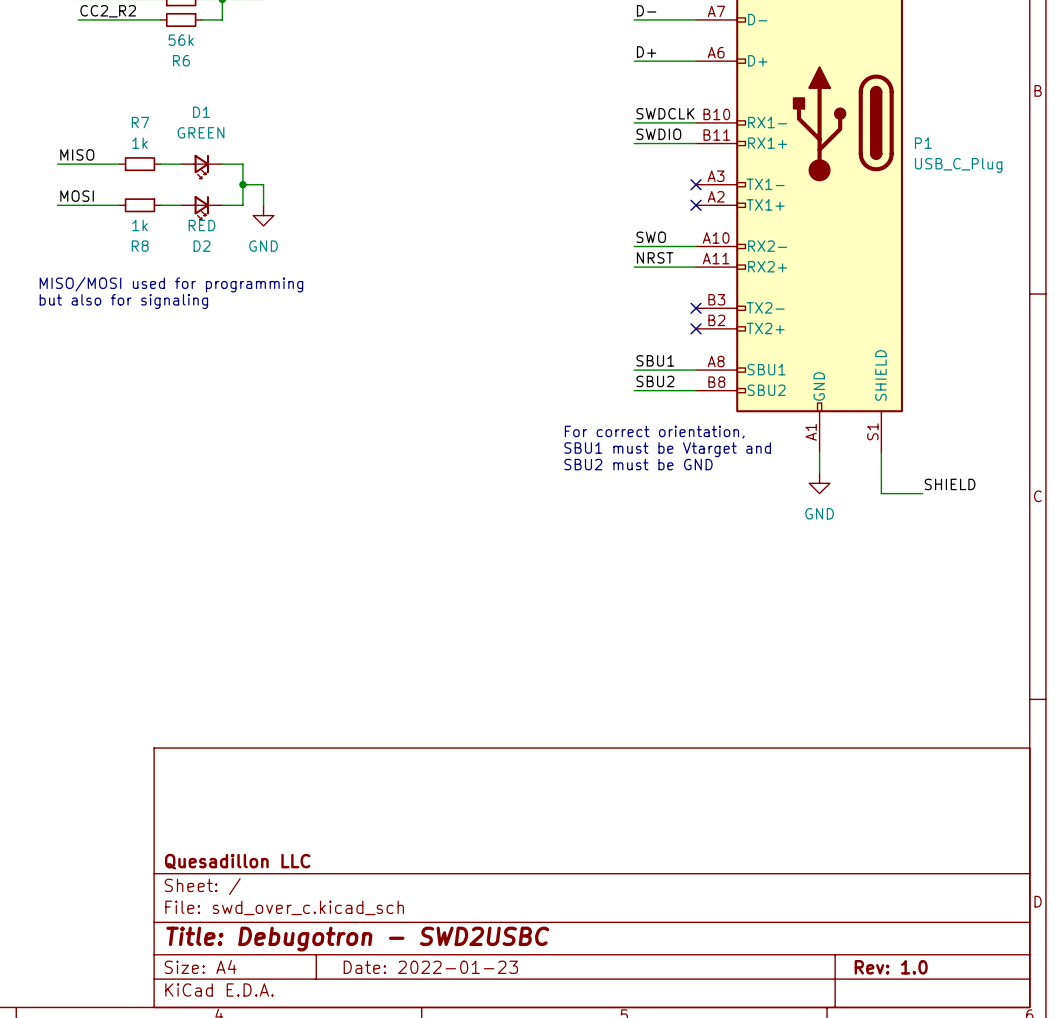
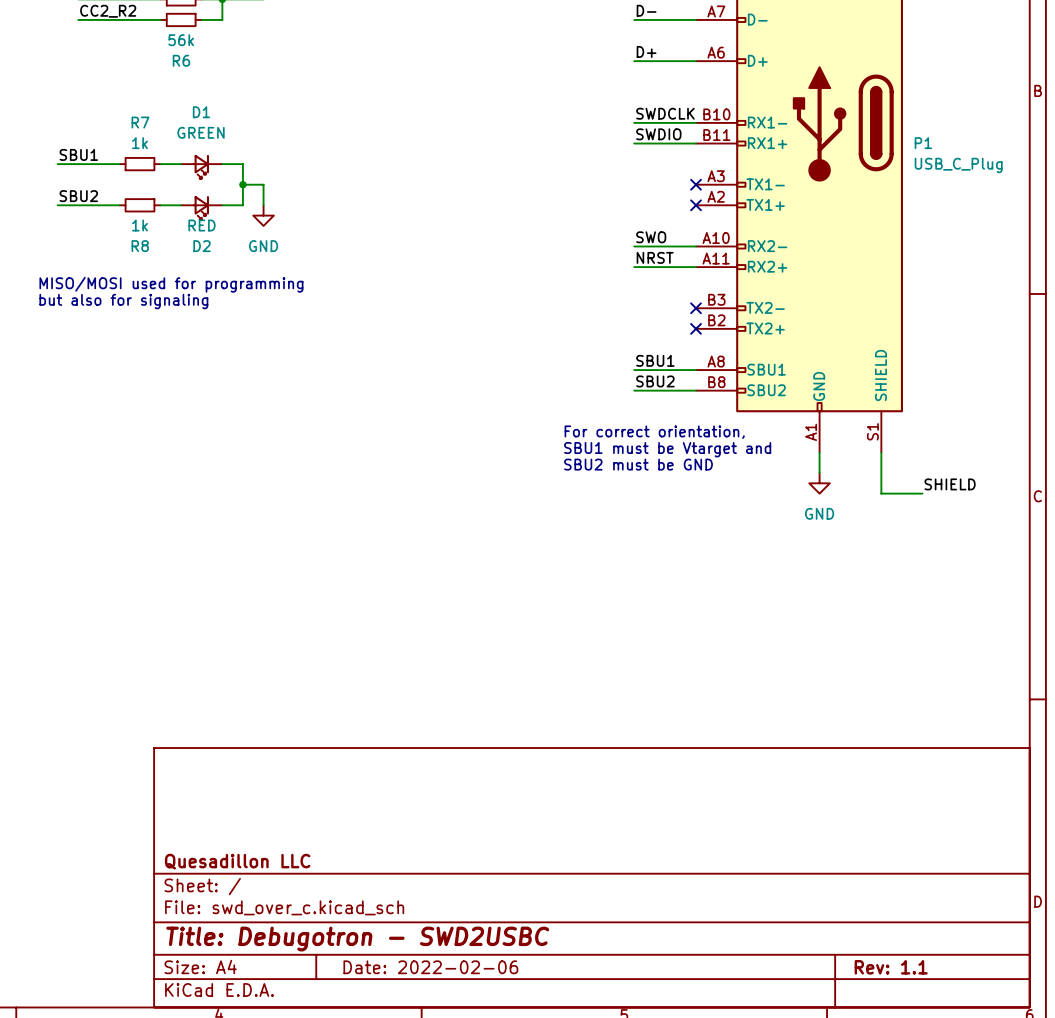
label: MISO (77, 154) -> SBU1 (78, 154)
label: MOSI (77, 196) -> SBU2 (78, 196)
title block: Date: 2022-01-23 (430, 967) -> Date: 2022-02-06 (430, 967)
title block: Rev: 1.0 (891, 967) -> Rev: 1.1 (891, 967)

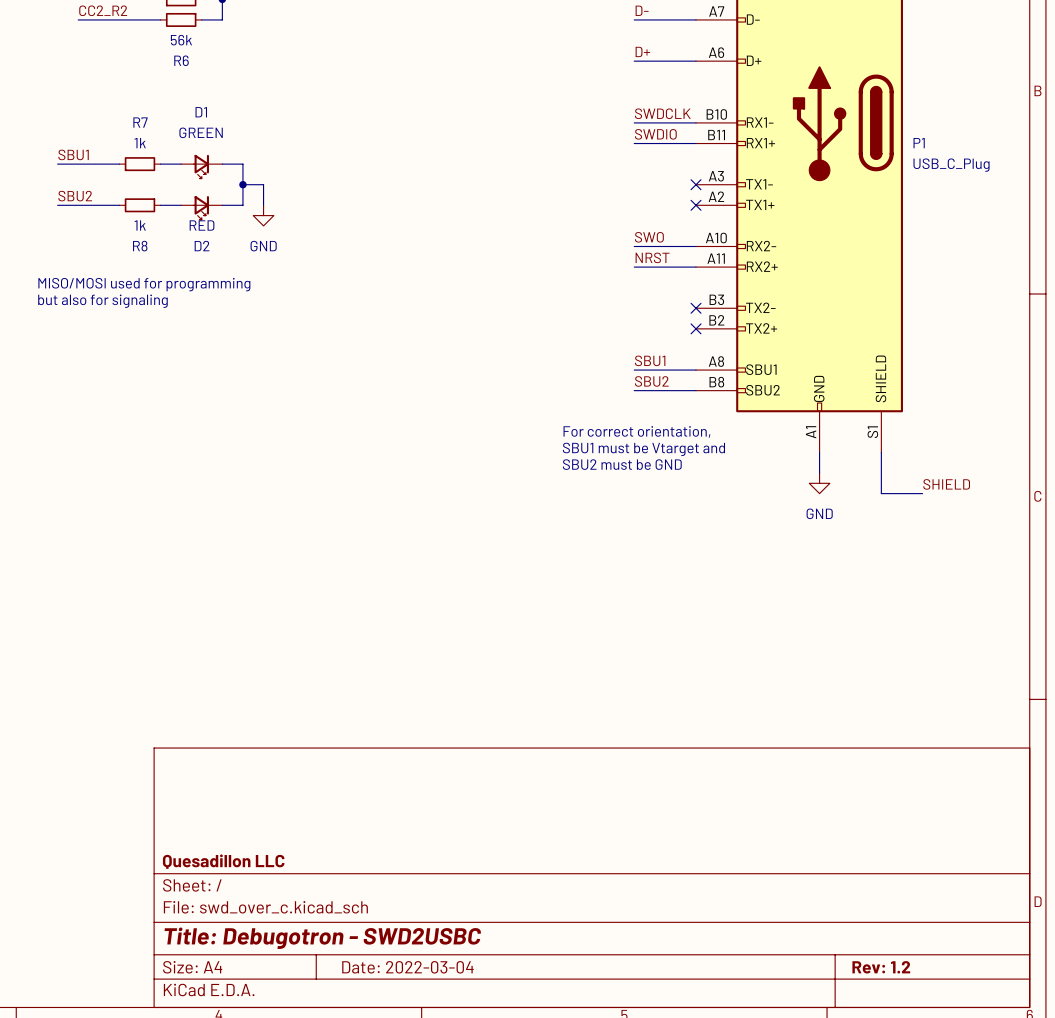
title block: Date: 2022-02-06 (430, 967) -> Date: 2022-03-04 (407, 967)
title block: Rev: 1.1 (891, 967) -> Rev: 1.2 (881, 967)

